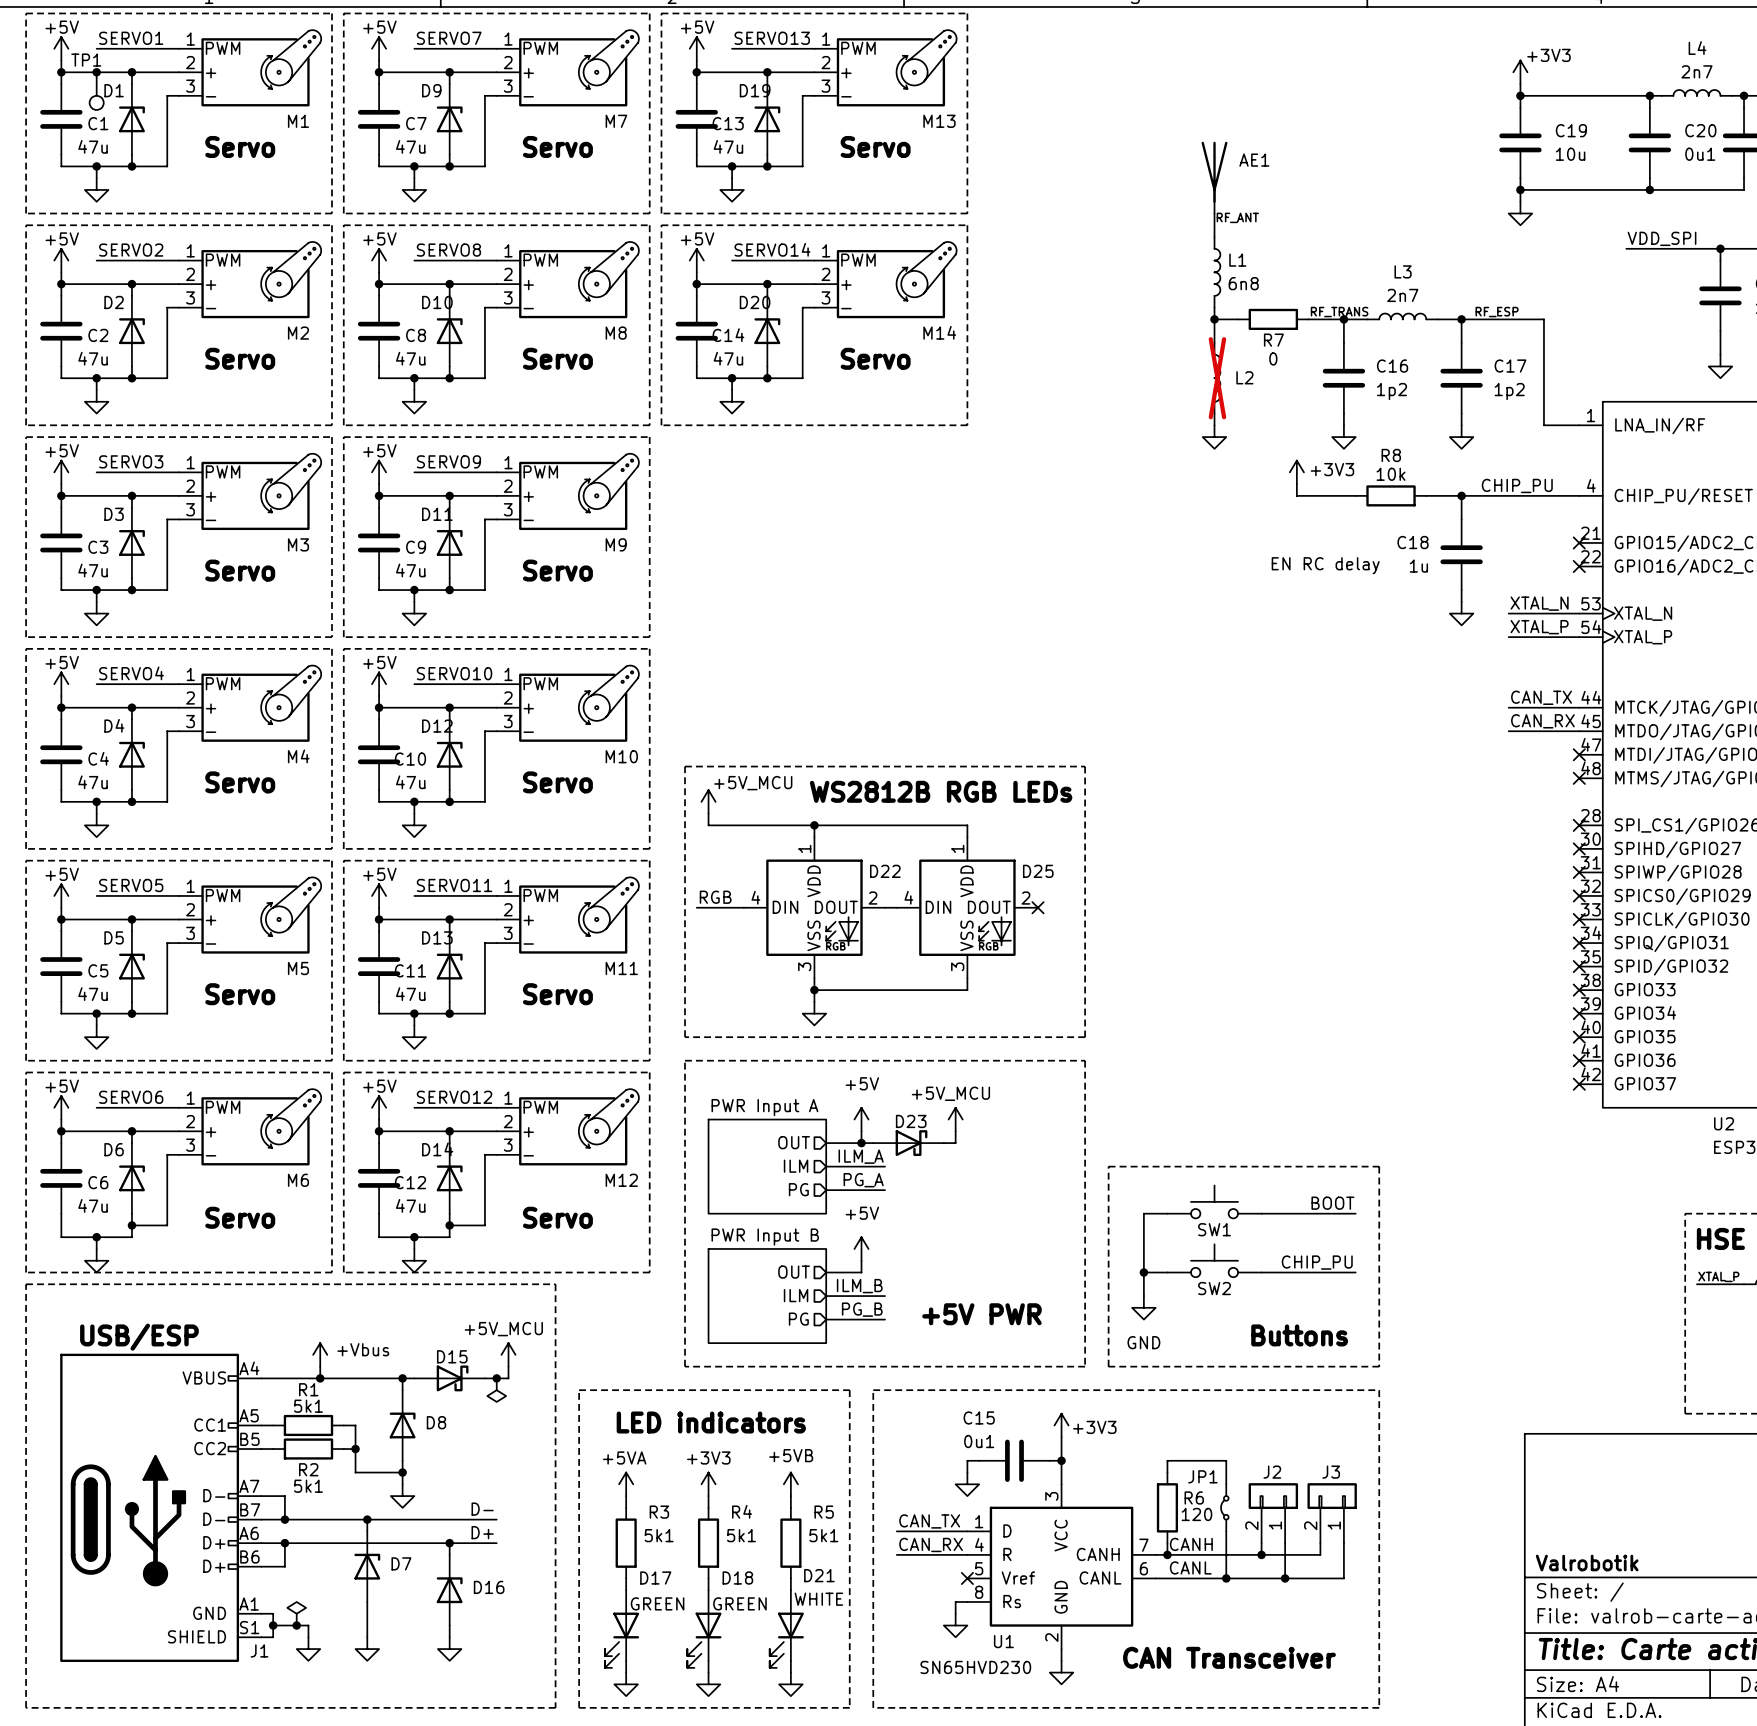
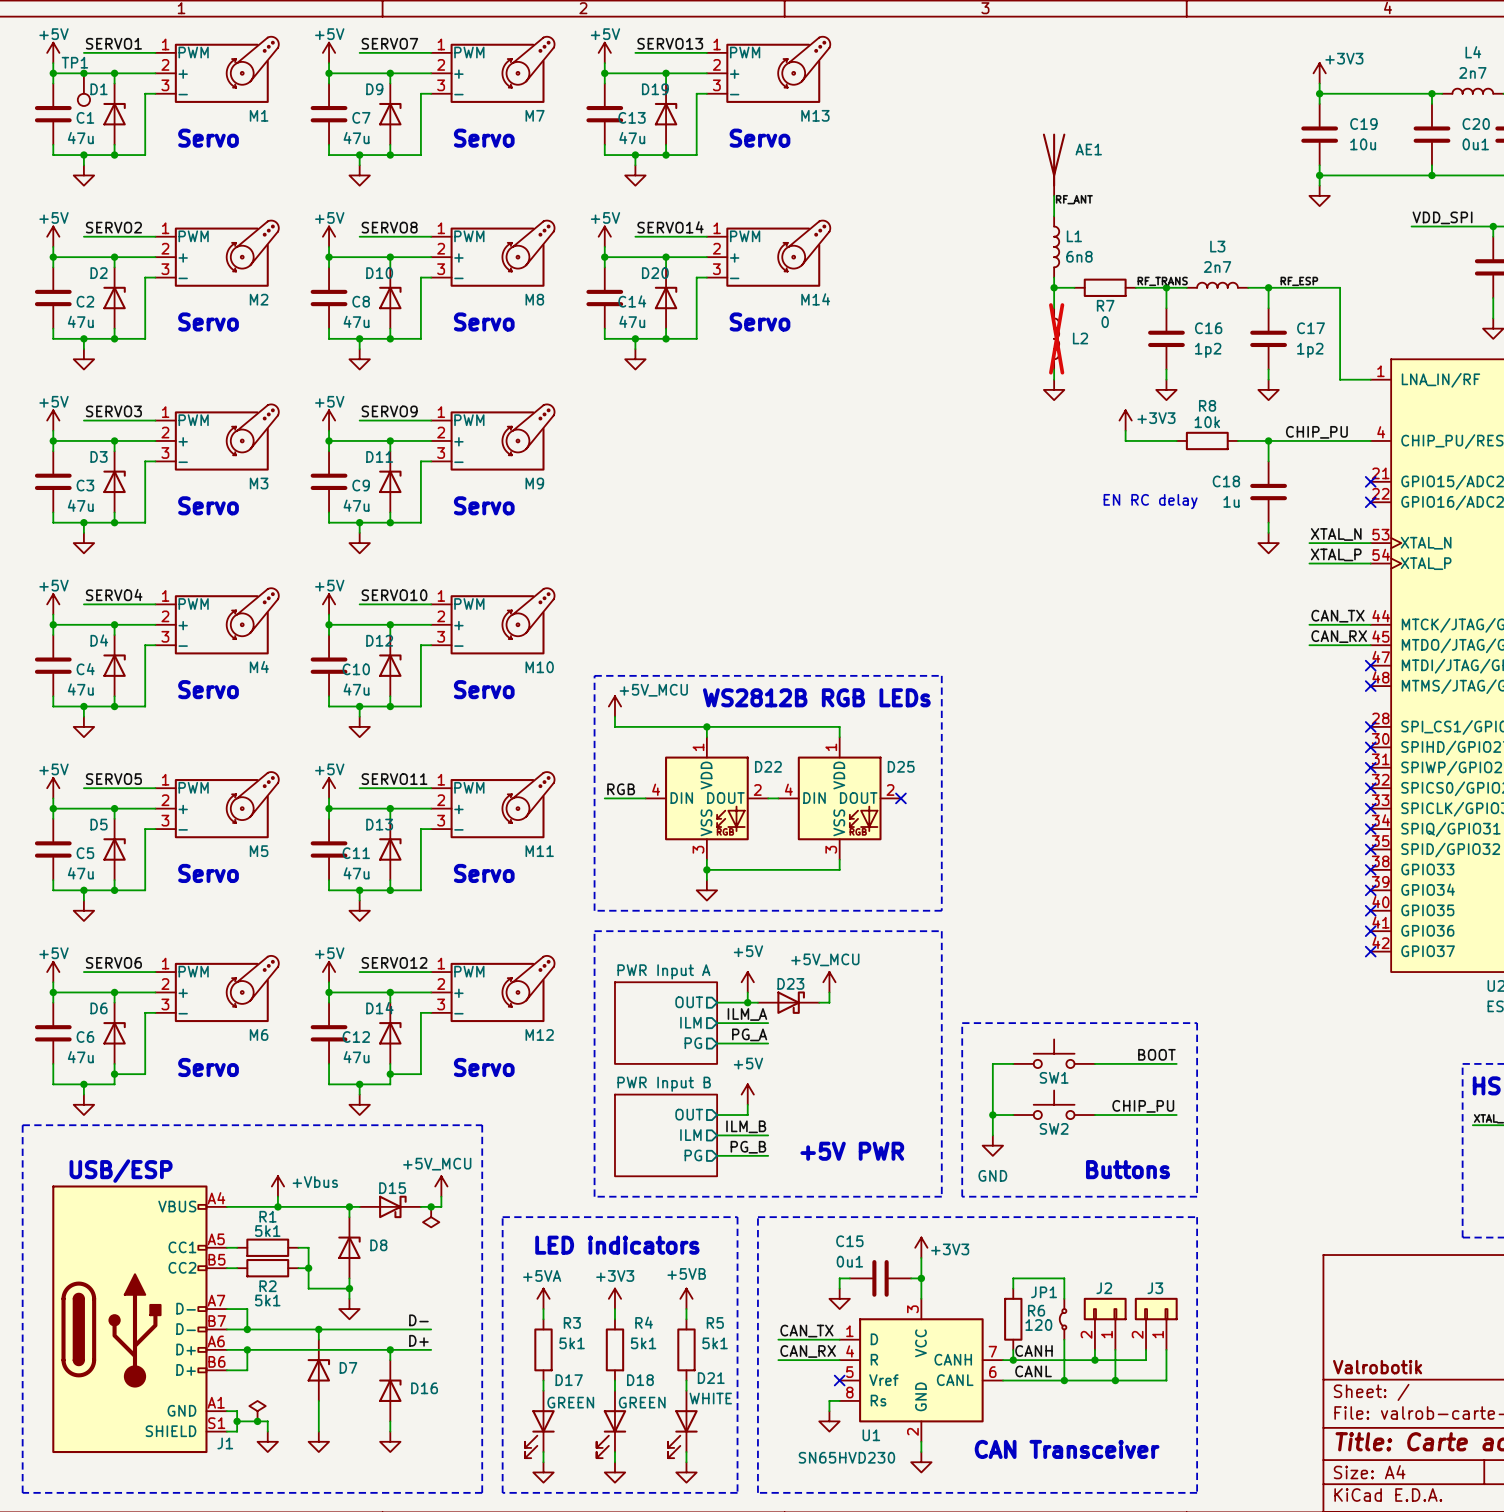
line: (26, 13) (332, 13) (332, 213) (26, 213) (26, 13) -> none
line: (343, 13) (343, 213) (649, 213) (649, 13) (343, 13) -> none
line: (661, 13) (661, 213) (967, 213) (967, 13) (661, 13) -> none
line: (26, 225) (332, 225) (332, 425) (26, 425) (26, 225) -> none
line: (343, 225) (343, 425) (649, 425) (649, 225) (343, 225) -> none
line: (661, 225) (967, 225) (967, 425) (661, 425) (661, 225) -> none
line: (26, 437) (26, 637) (332, 637) (332, 437) (26, 437) -> none
line: (343, 437) (343, 637) (649, 637) (649, 437) (343, 437) -> none
line: (26, 648) (332, 648) (332, 848) (26, 848) (26, 648) -> none
line: (343, 648) (649, 648) (649, 848) (343, 848) (343, 648) -> none
line: (26, 860) (26, 1060) (332, 1060) (332, 860) (26, 860) -> none
line: (343, 860) (343, 1060) (649, 1060) (649, 860) (343, 860) -> none
line: (26, 1072) (26, 1272) (332, 1272) (332, 1072) (26, 1072) -> none
line: (343, 1072) (343, 1272) (649, 1272) (649, 1072) (343, 1072) -> none

